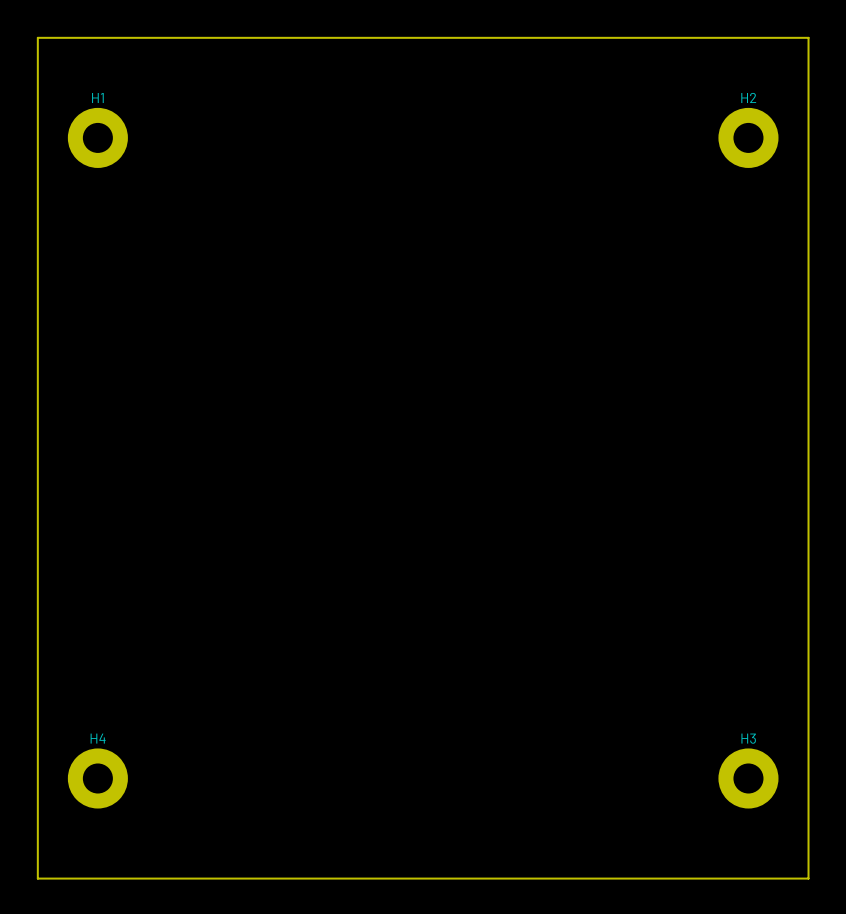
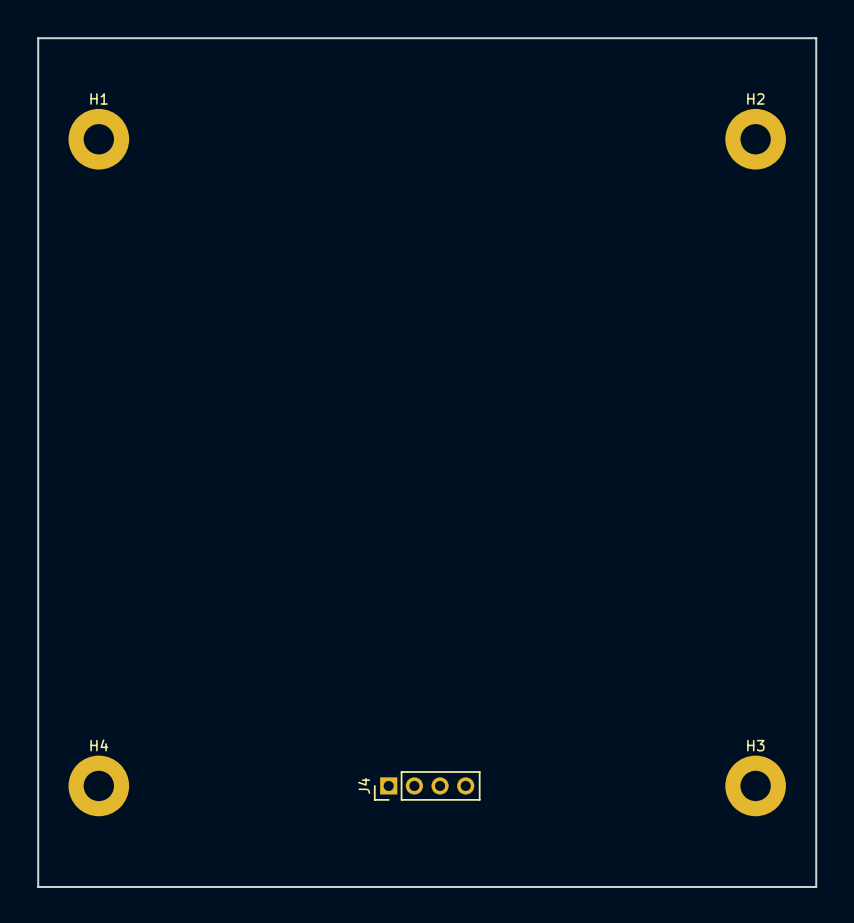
J4: none -> (427, 785)

